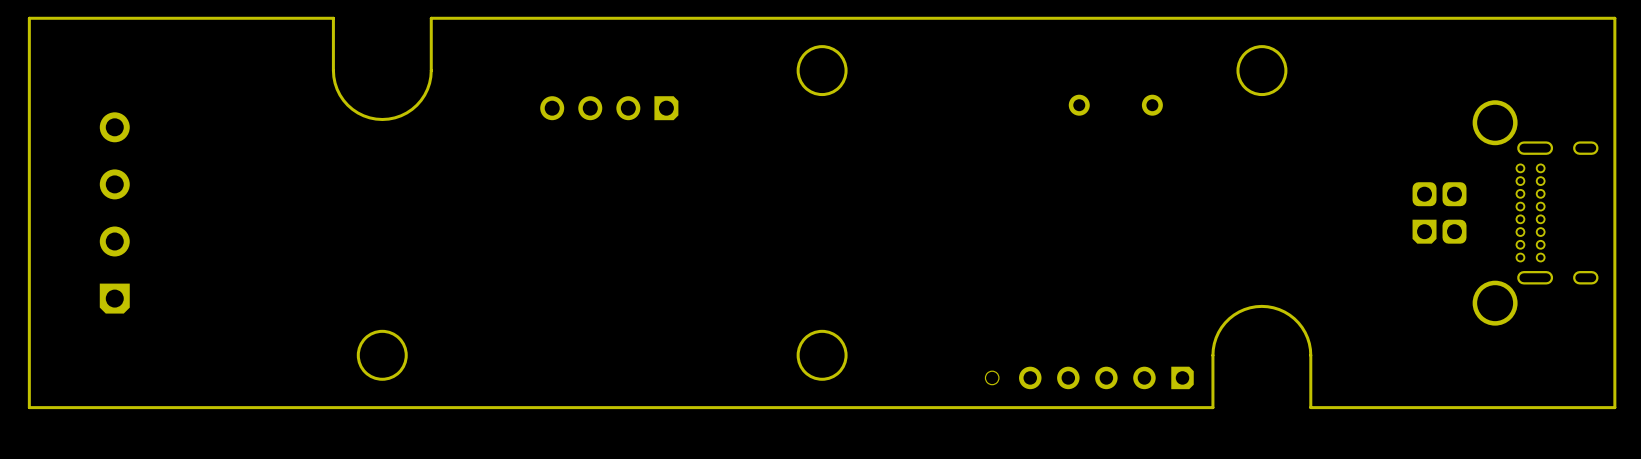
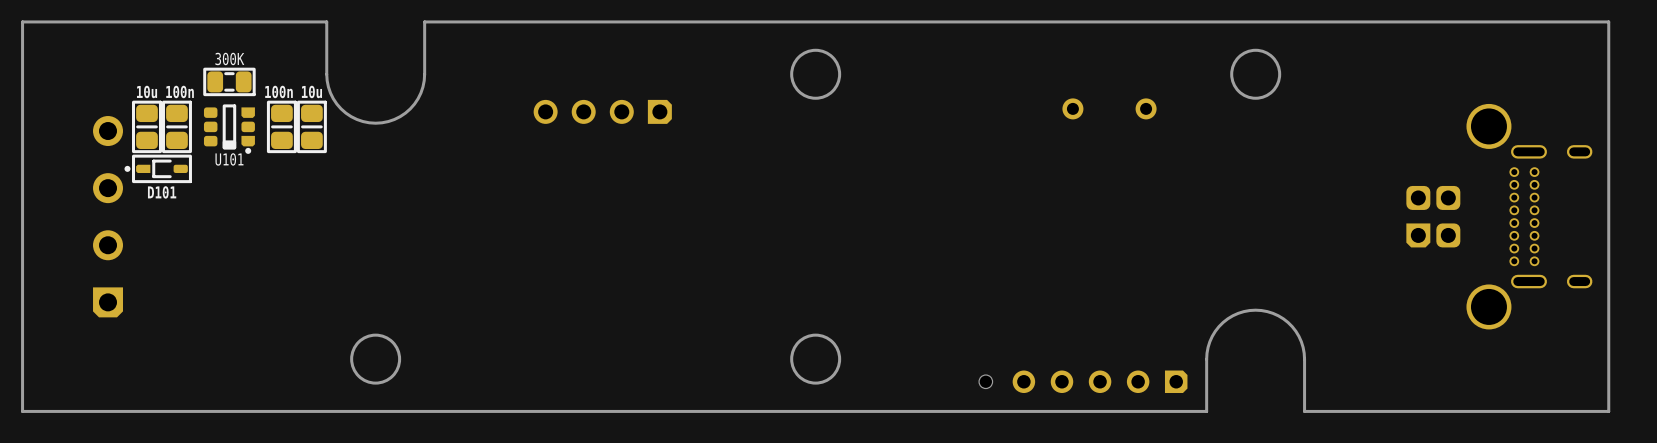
part: none -> 300K (229, 81)
part: none -> 10u (146, 126)
part: none -> 100n (176, 126)
part: none -> 100n (281, 126)
part: none -> 10u (311, 126)
U101: none -> (229, 129)
D101: none -> (158, 168)

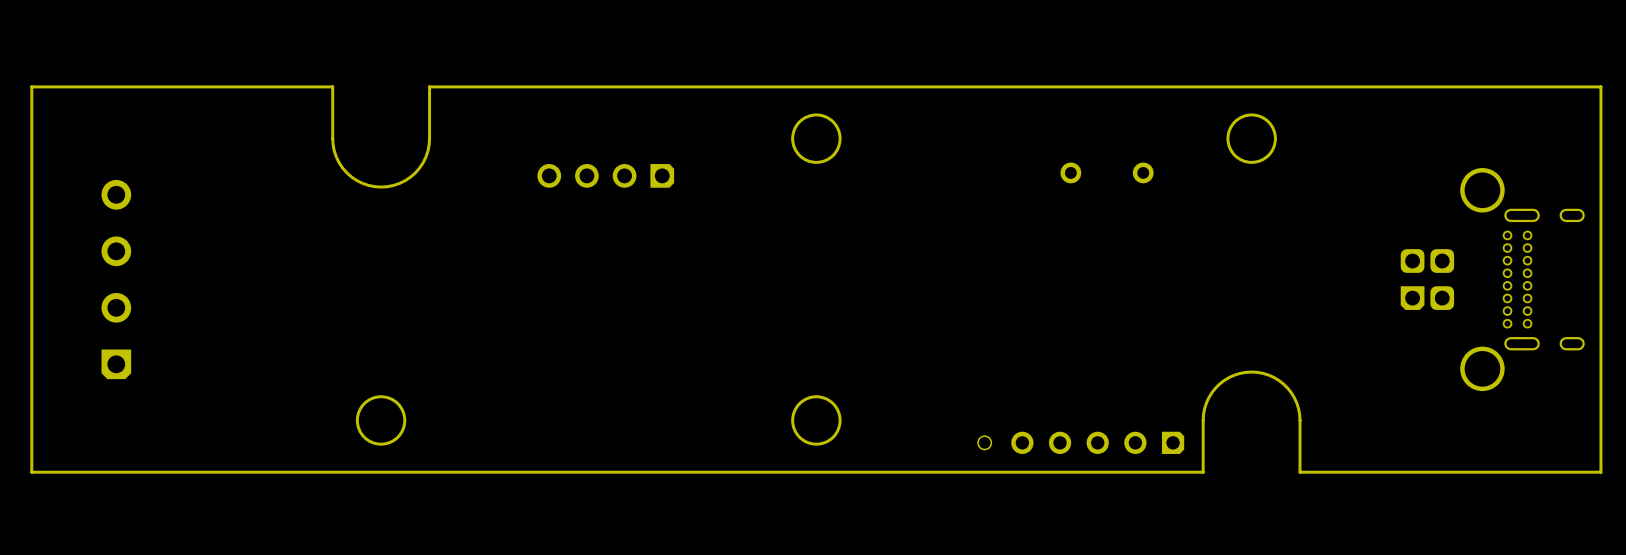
part: 300K (229, 81) -> none
part: 10u (146, 126) -> none
part: 100n (176, 126) -> none
part: 100n (281, 126) -> none
part: 10u (311, 126) -> none
U101: (229, 129) -> none
D101: (158, 168) -> none

